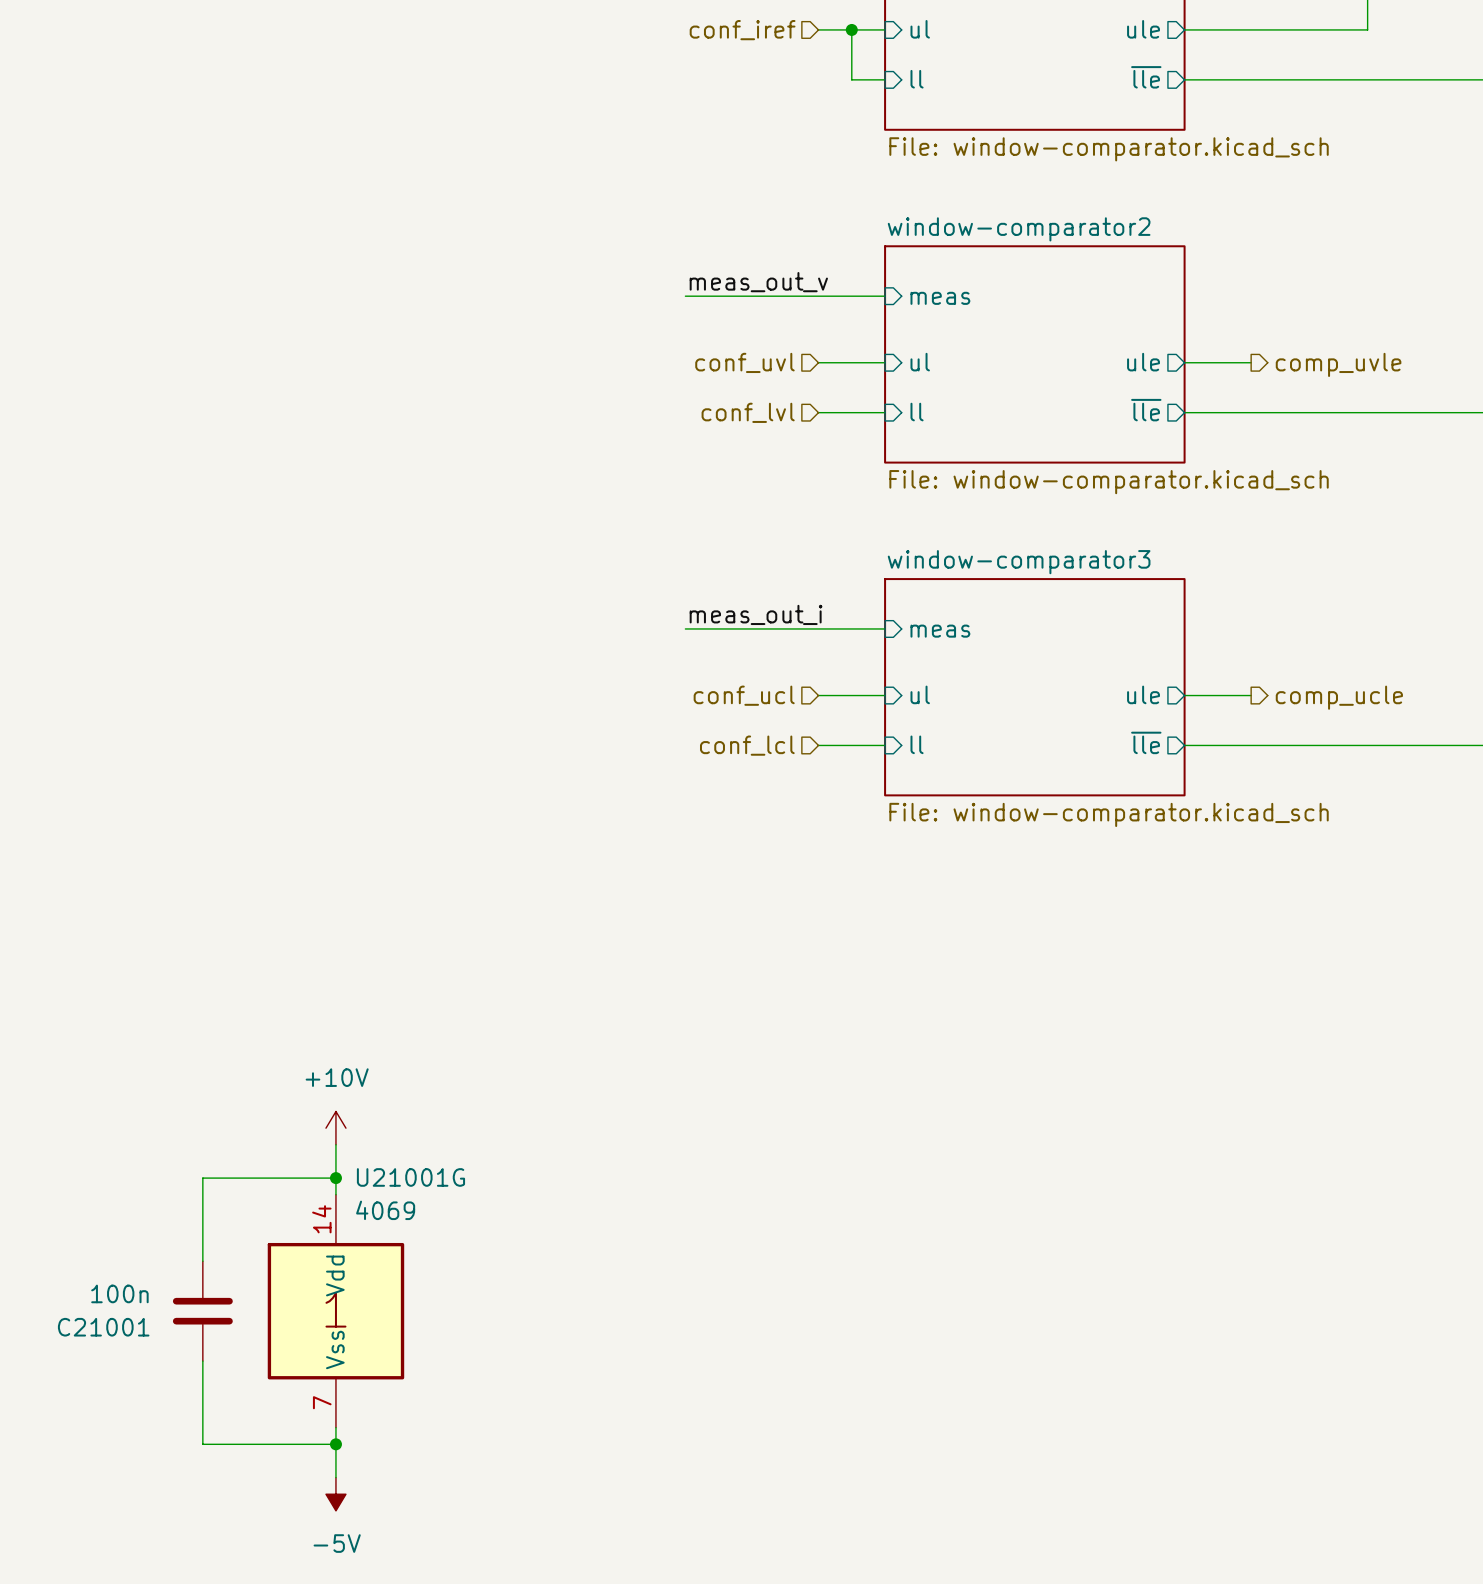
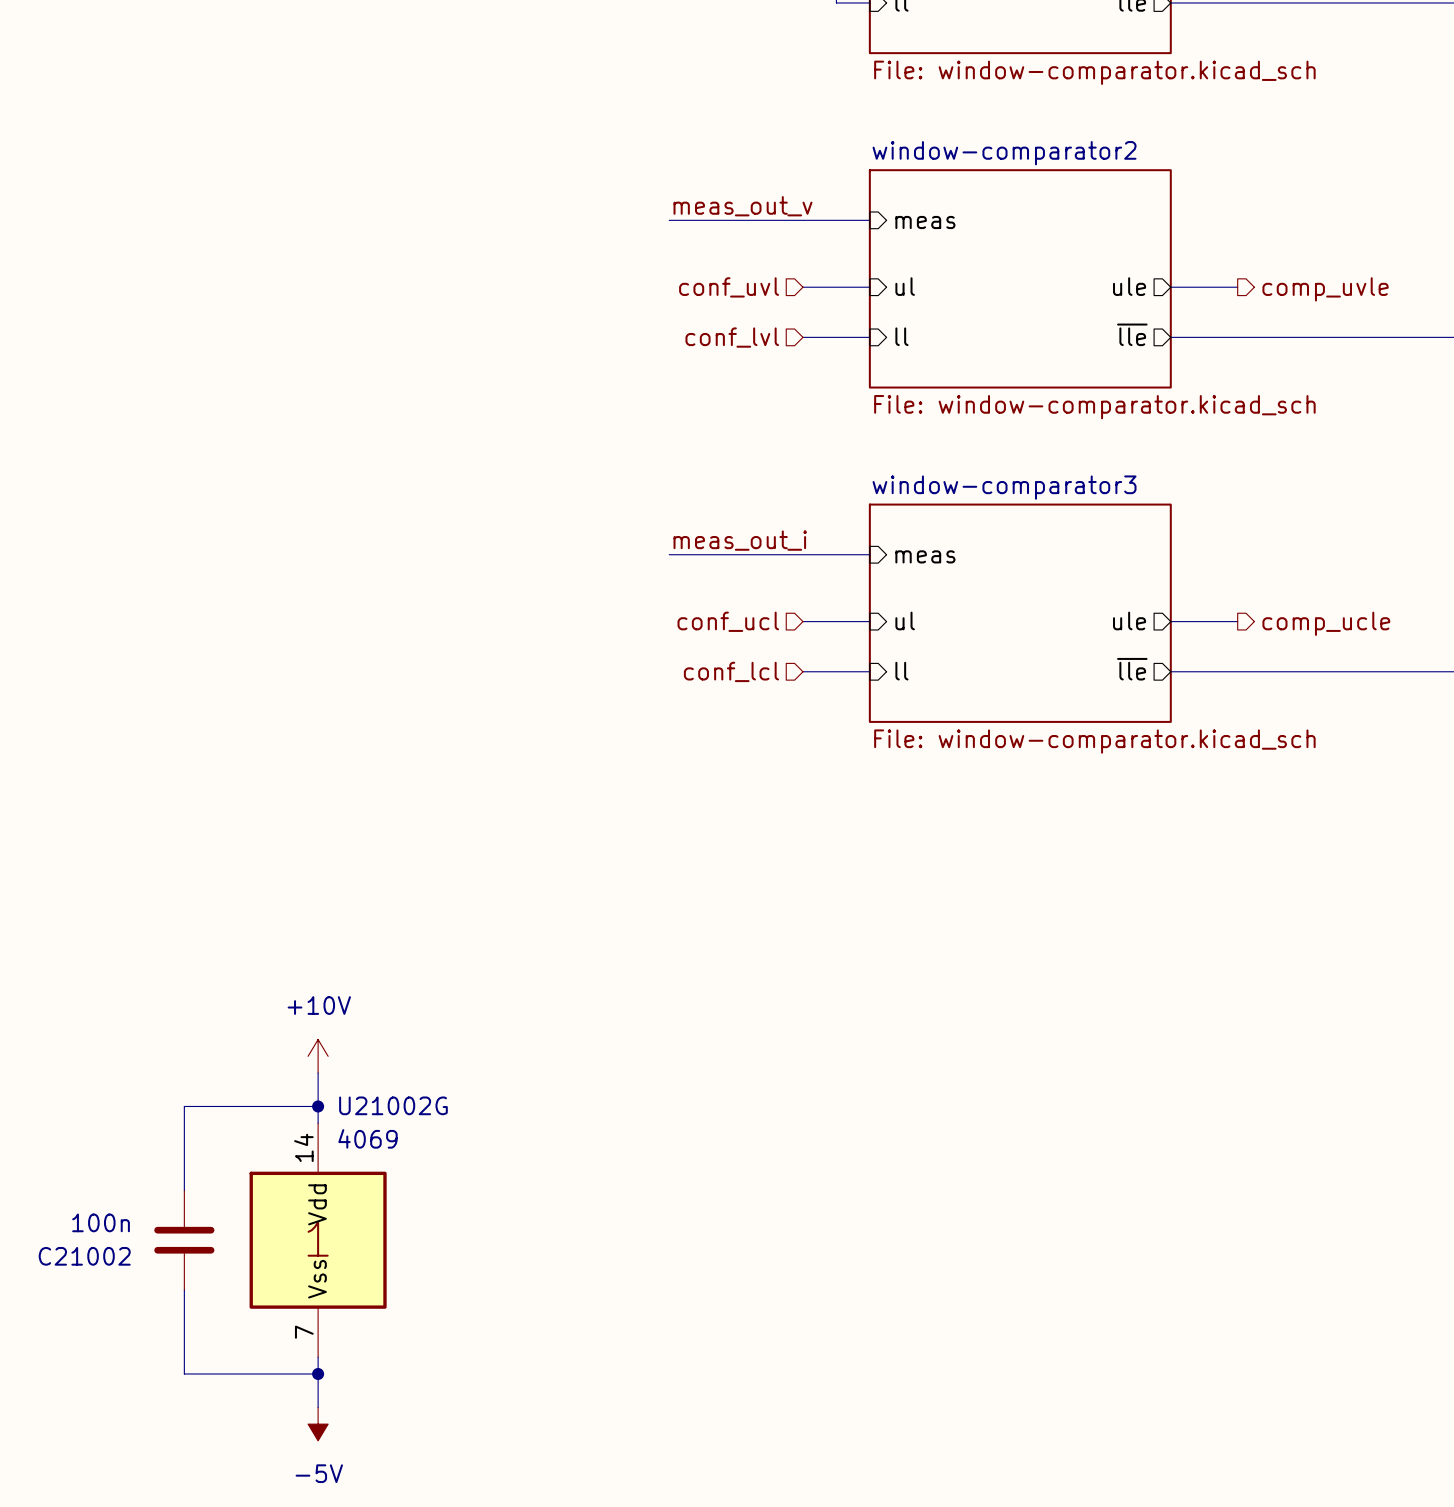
U21001G name: U21001G (410, 1177) -> U21002G (393, 1105)
C21001 name: C21001 (103, 1327) -> C21002 (84, 1256)

